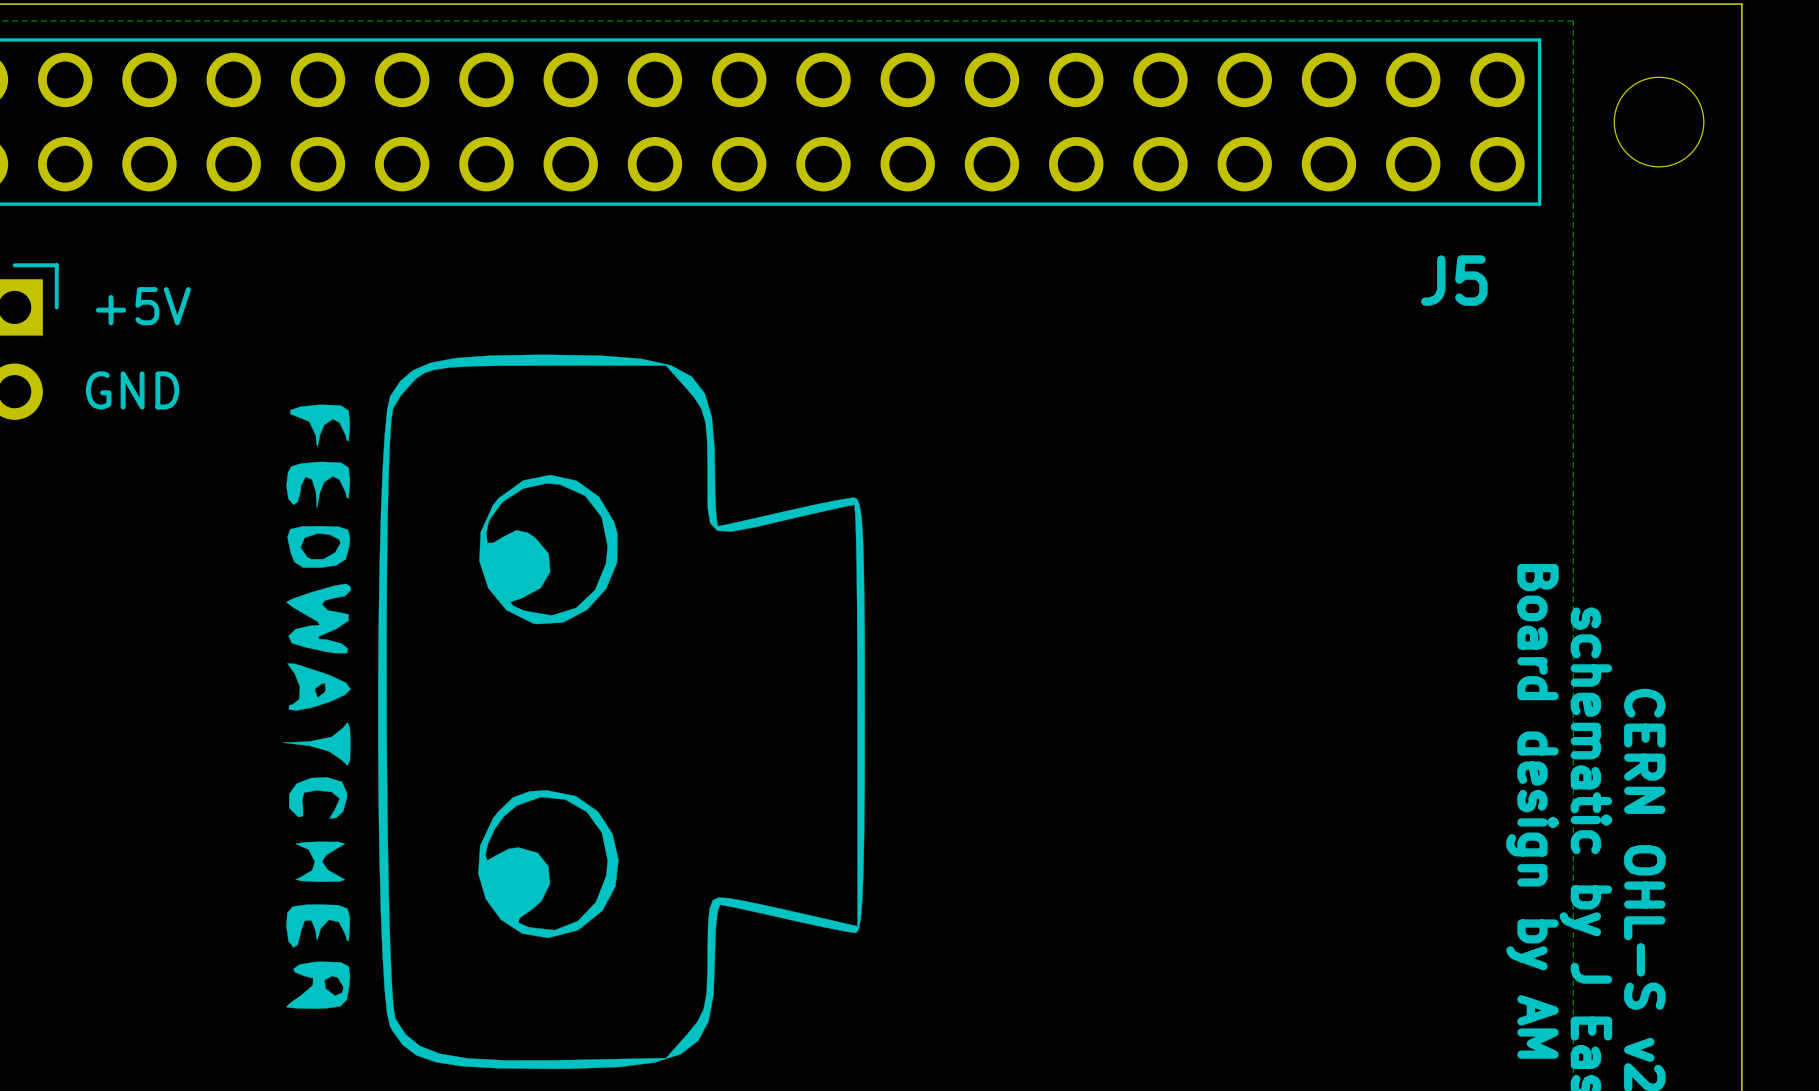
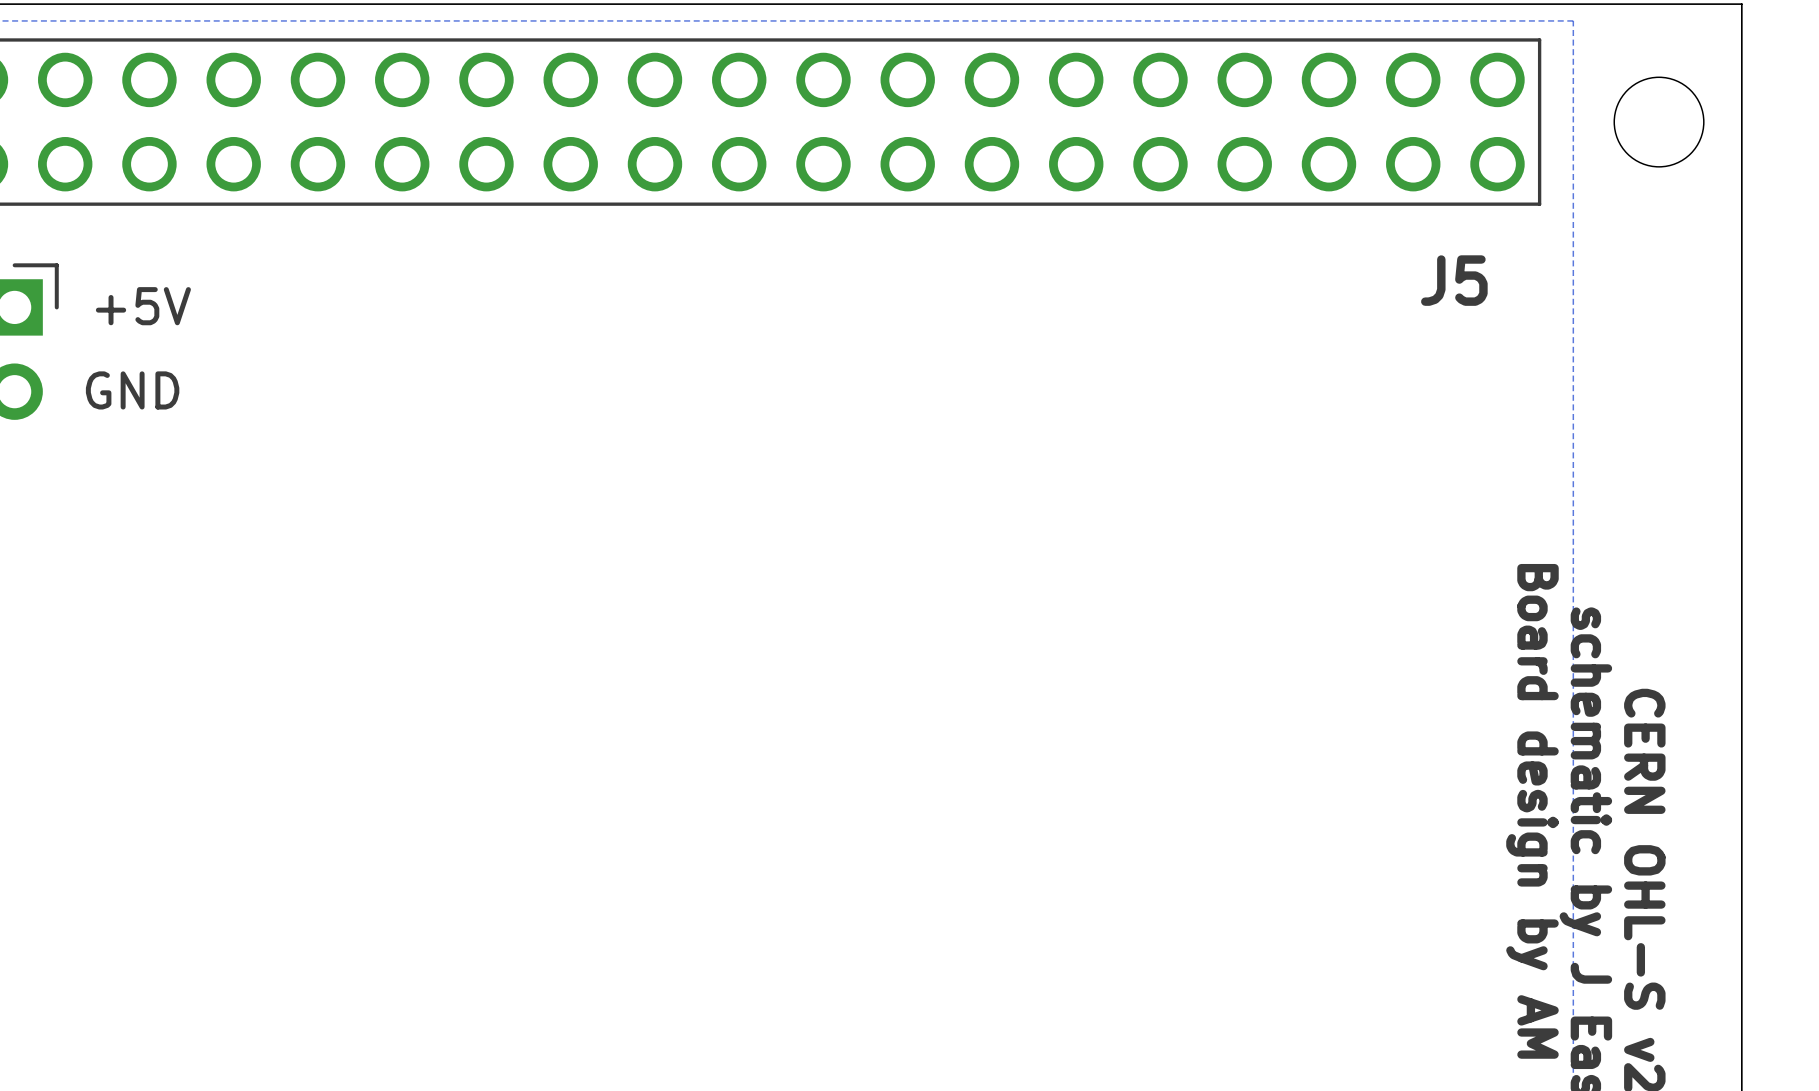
drawing: [282, 354, 865, 1070] -> none

